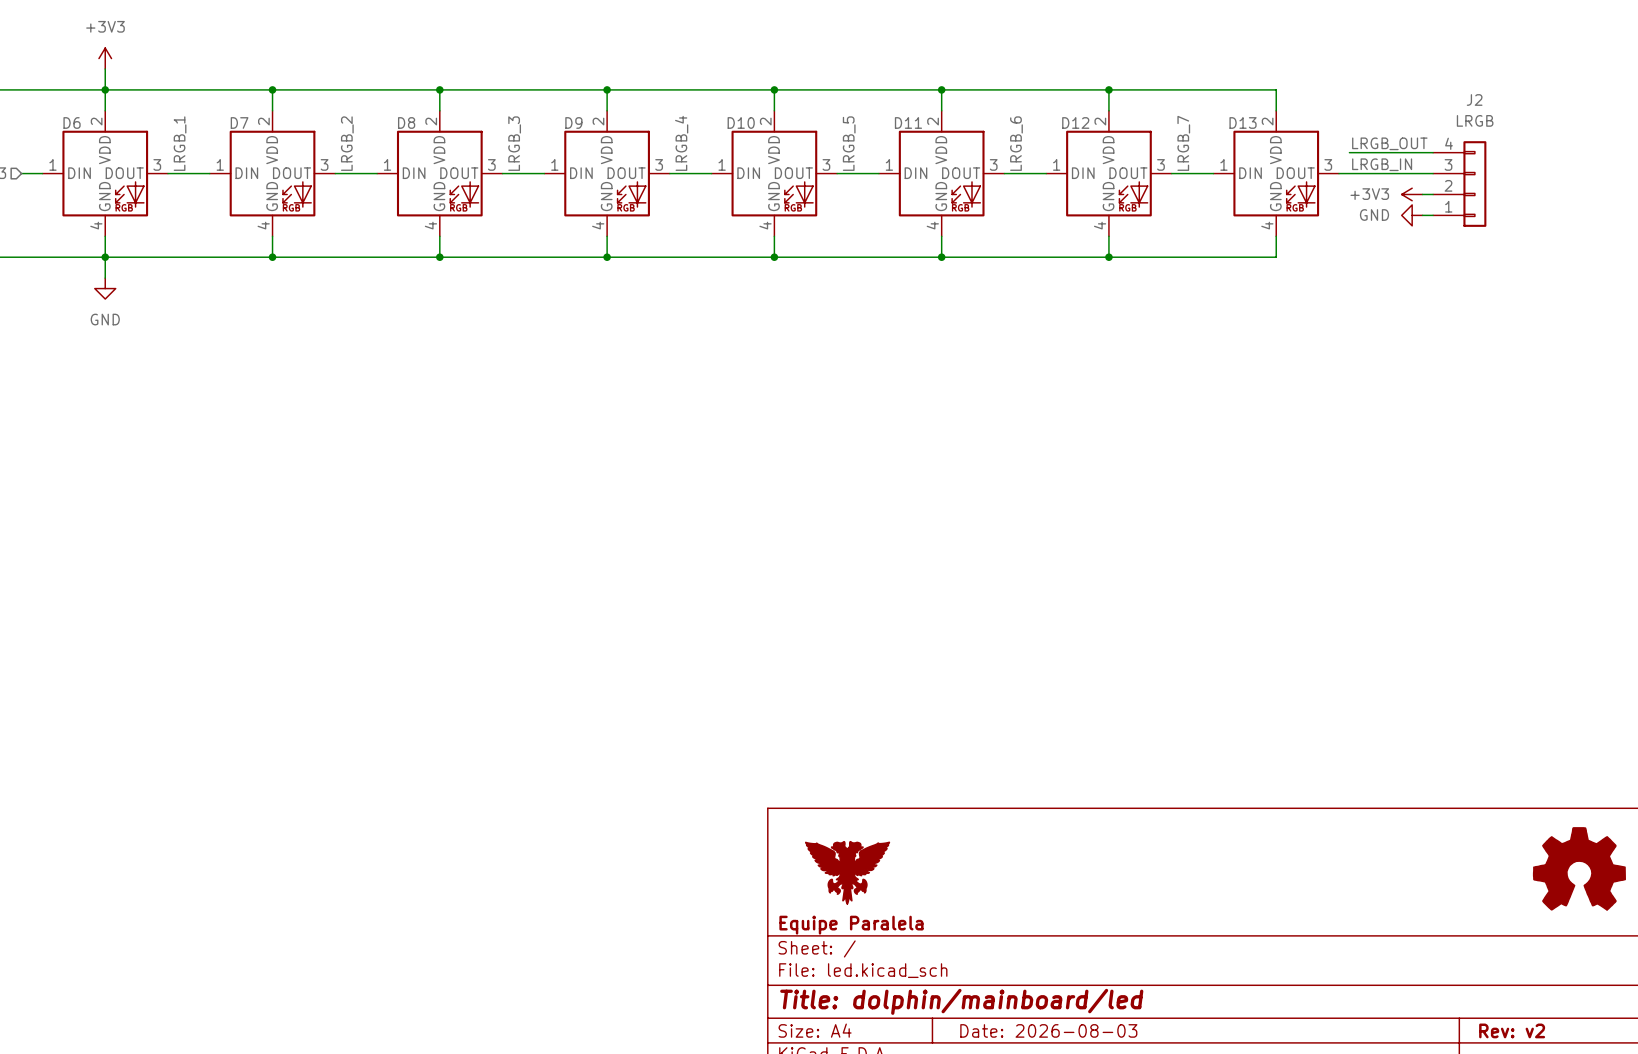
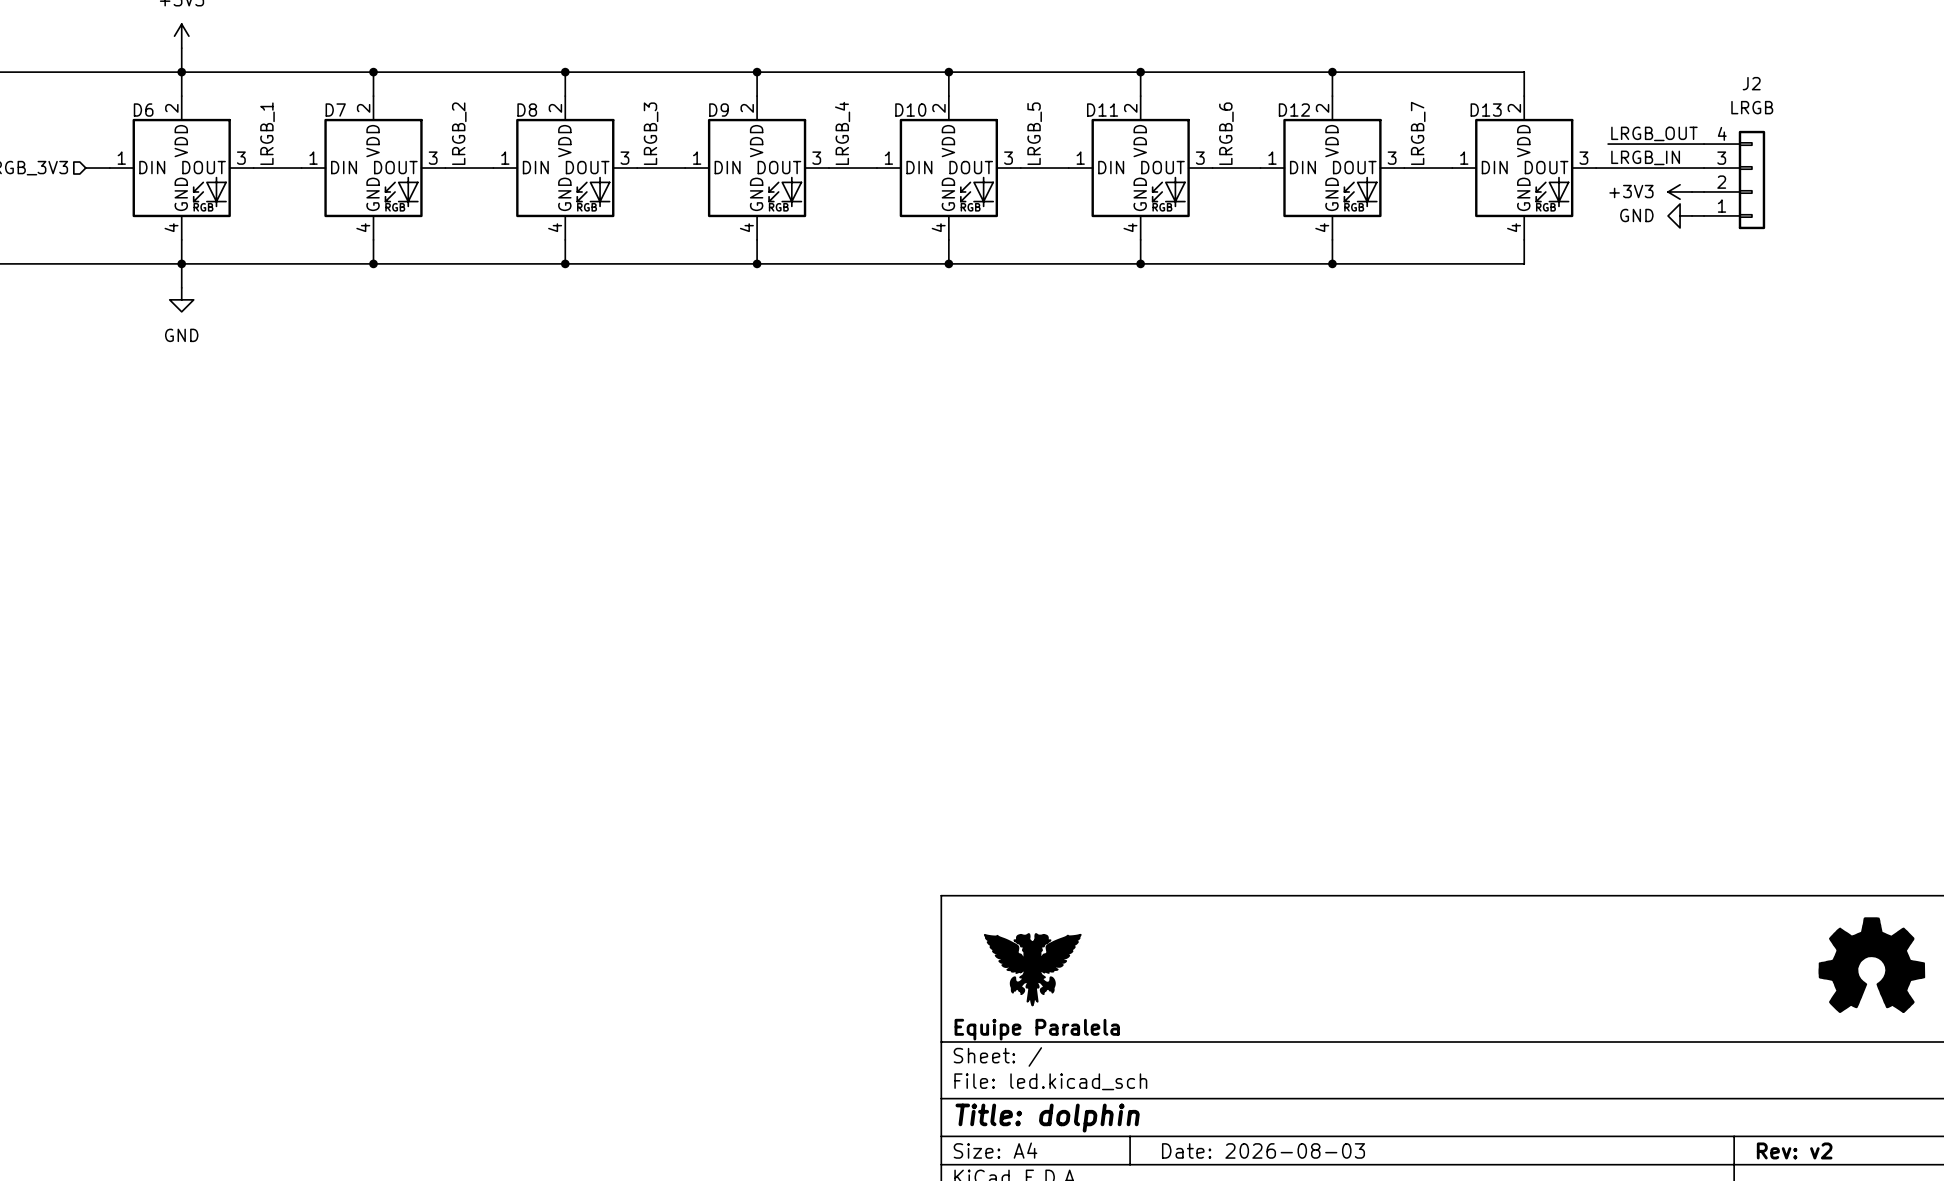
title block: Title: dolphin/mainboard/led (961, 1001) -> Title: dolphin (1047, 1118)

